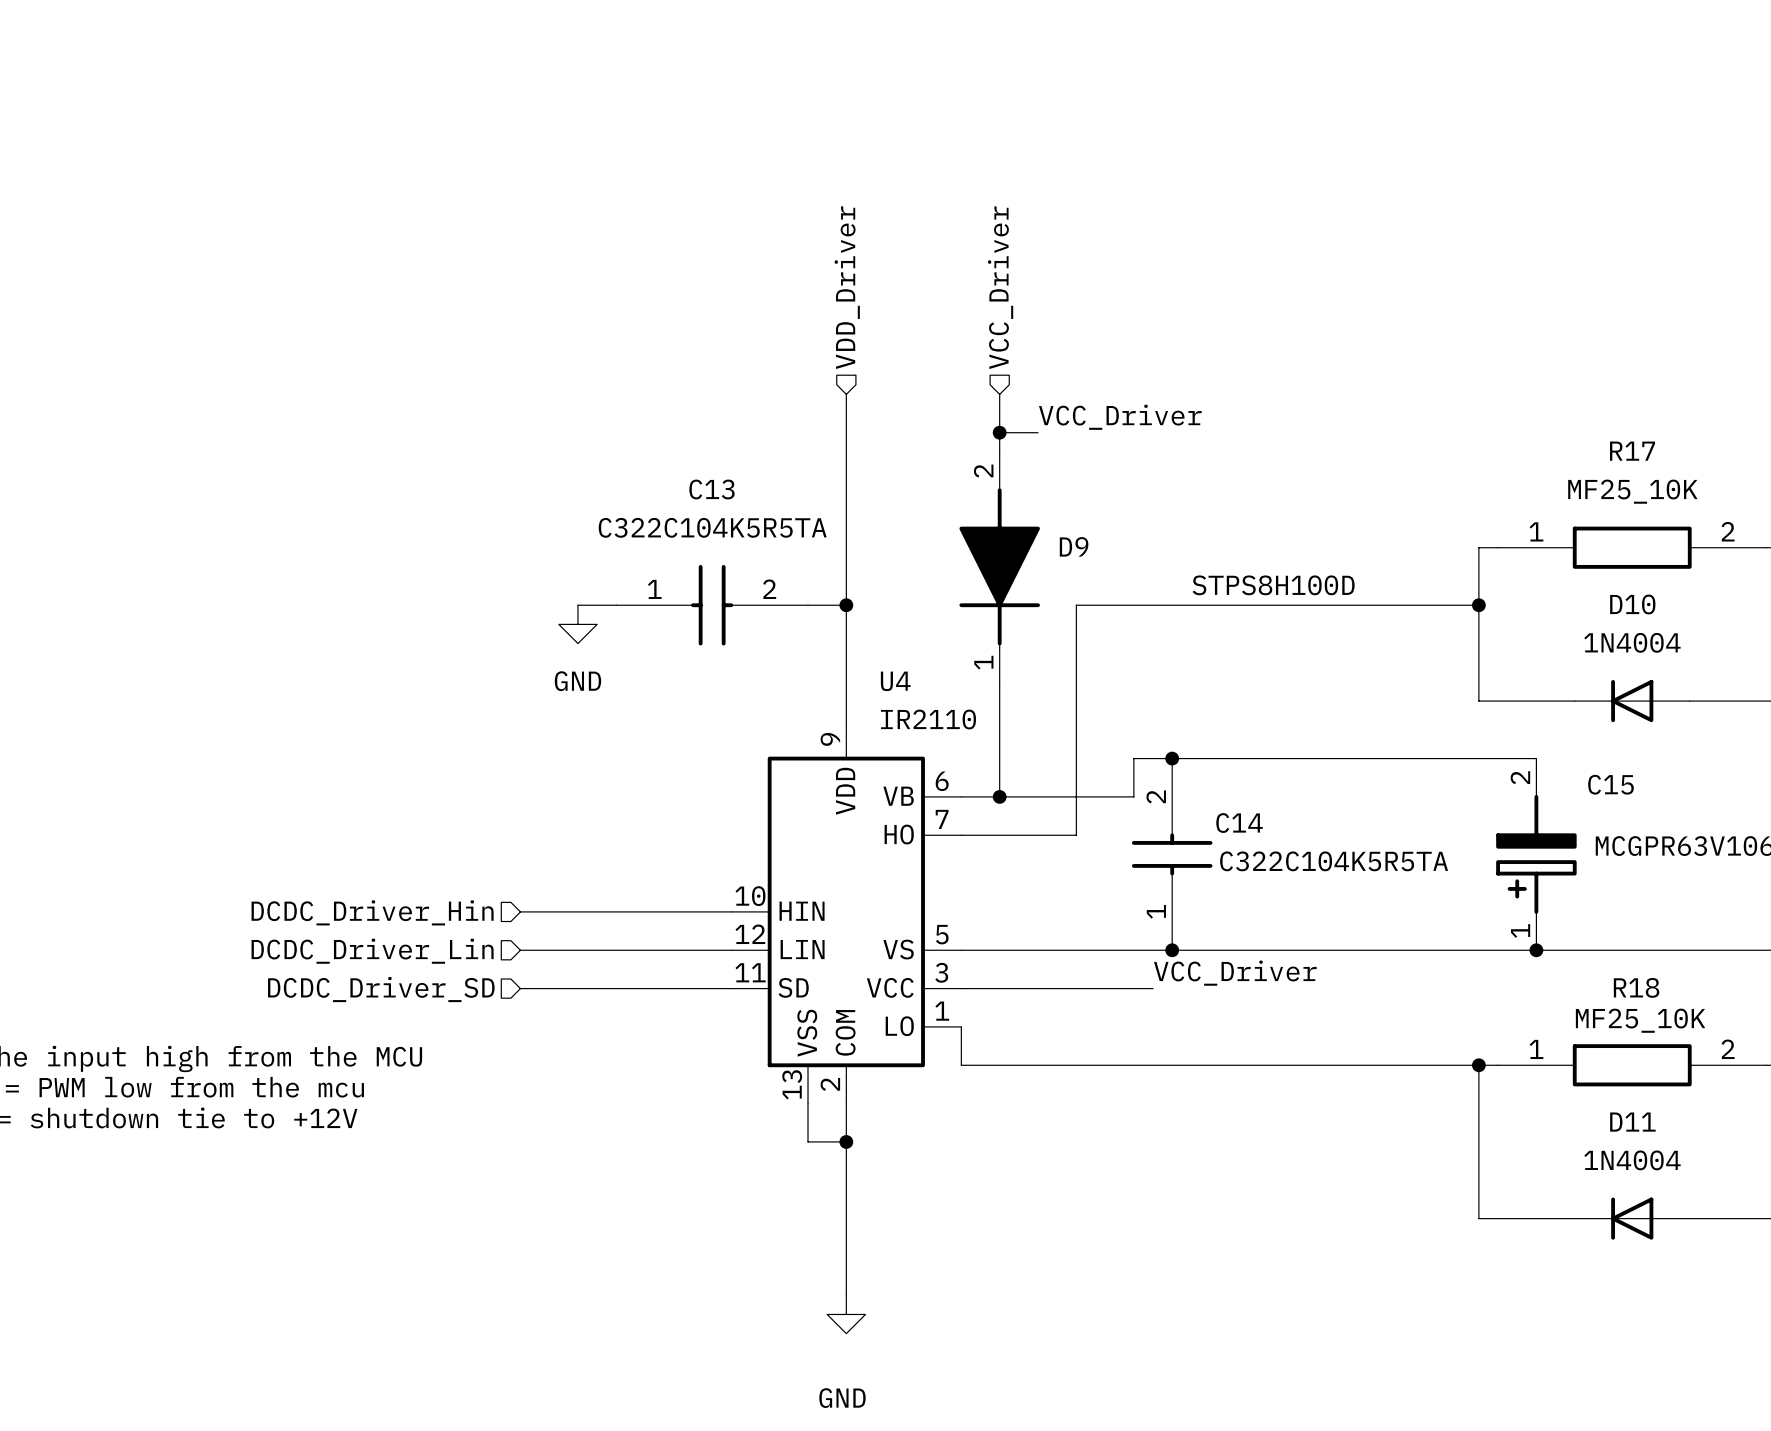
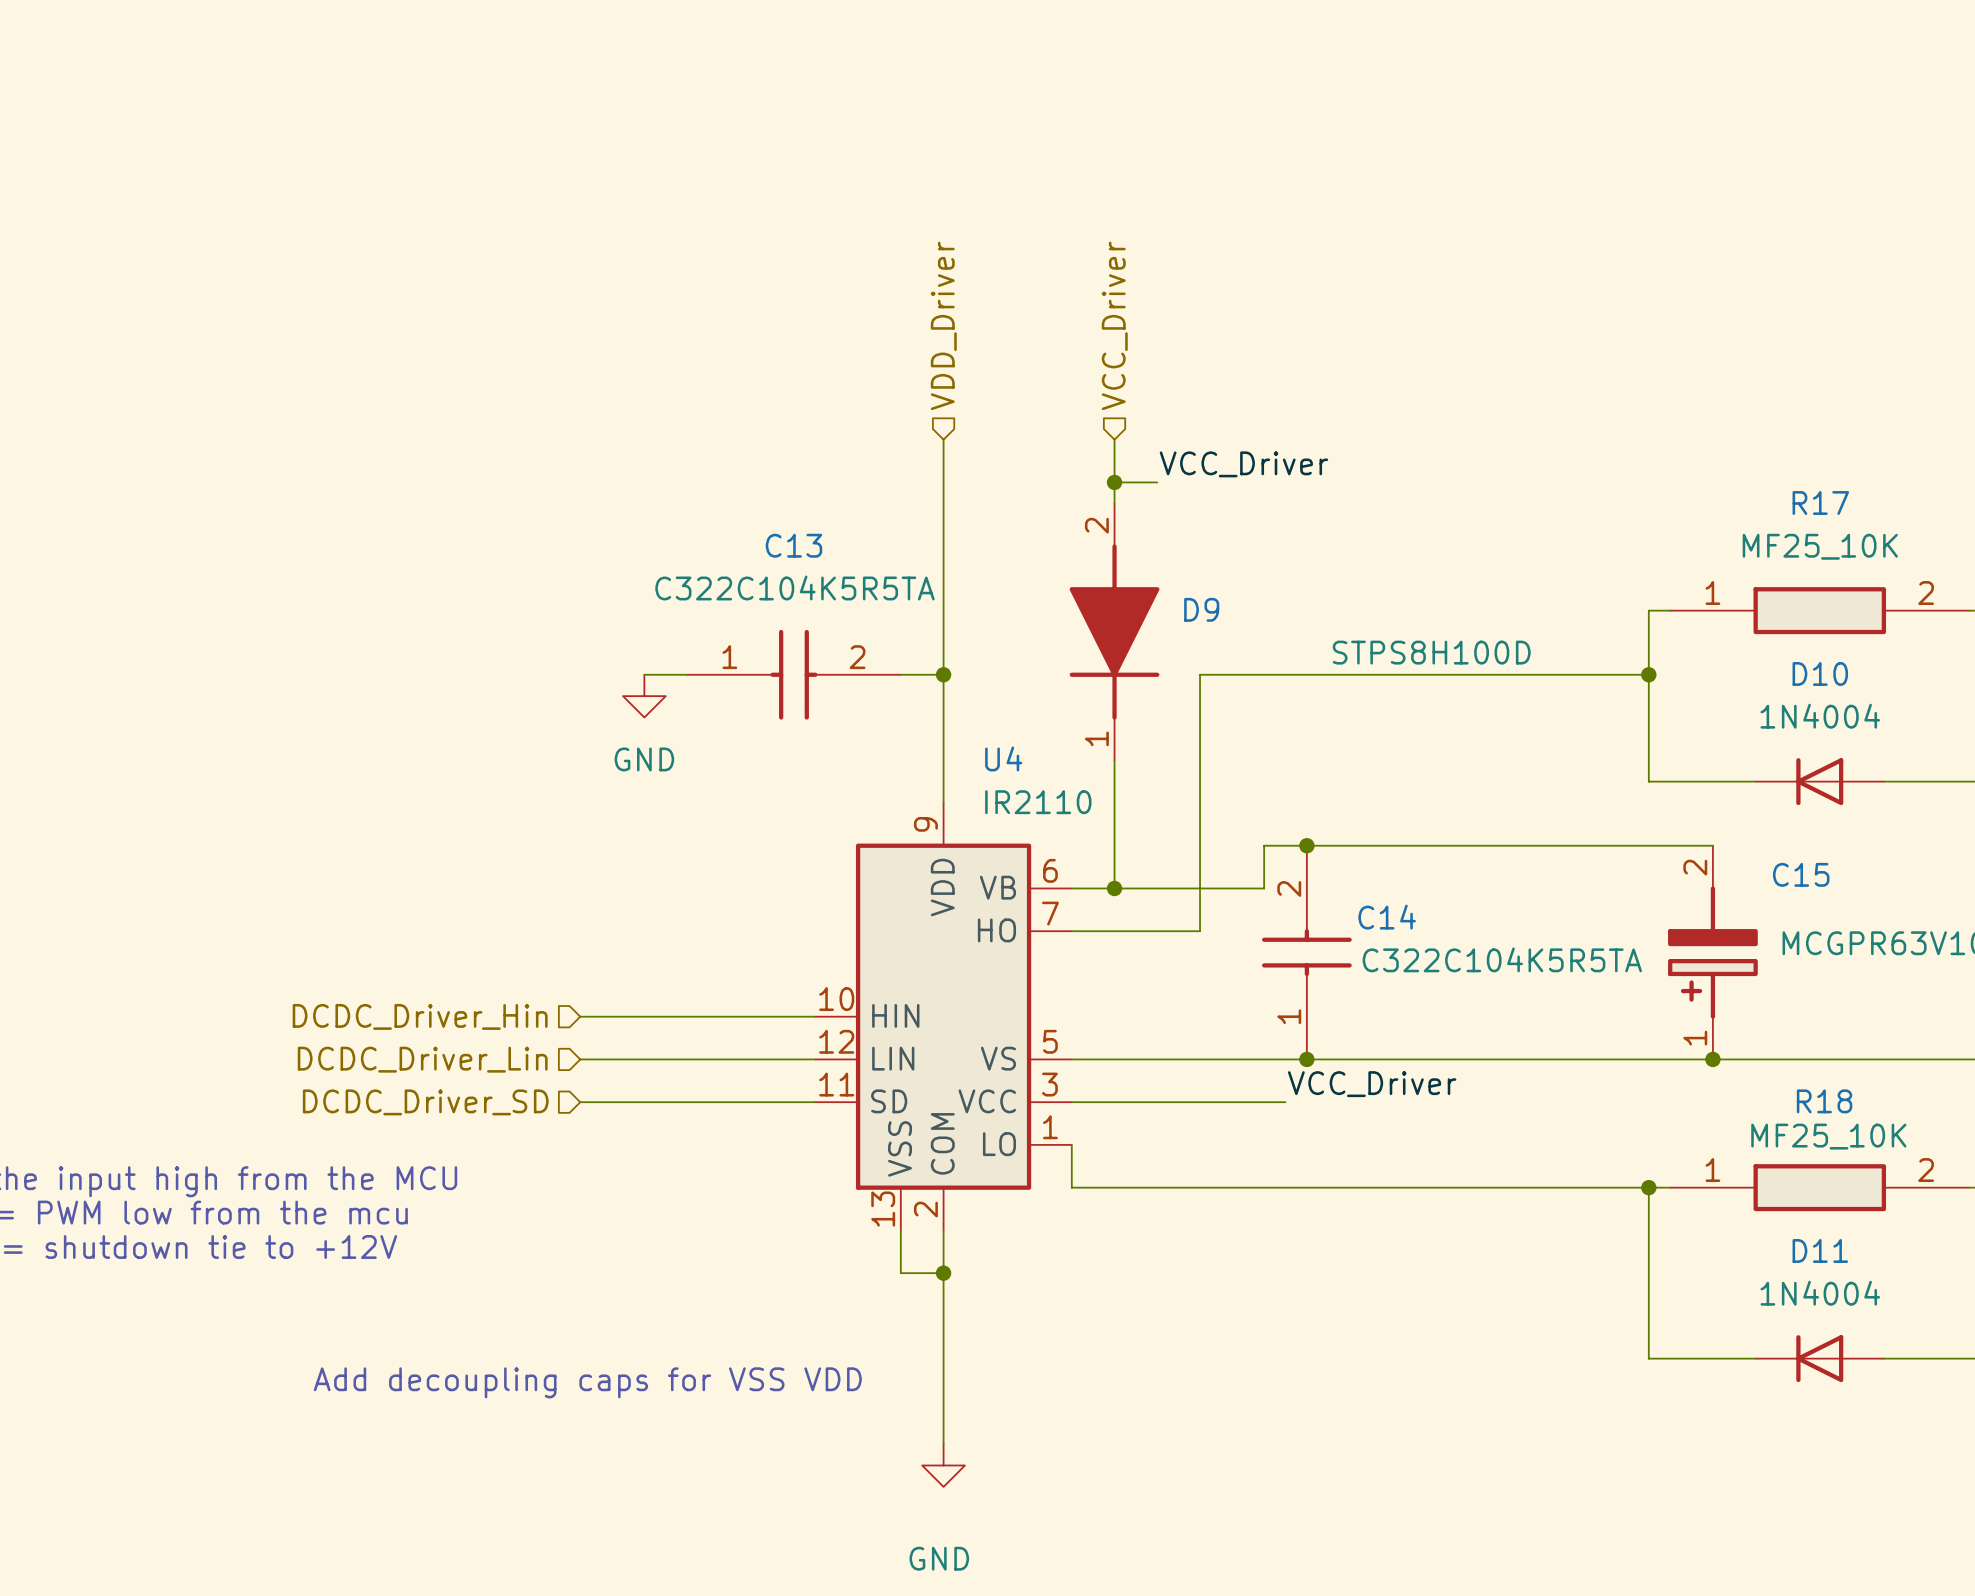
text: none -> Add decoupling caps for VSS VDD (587, 1382)

